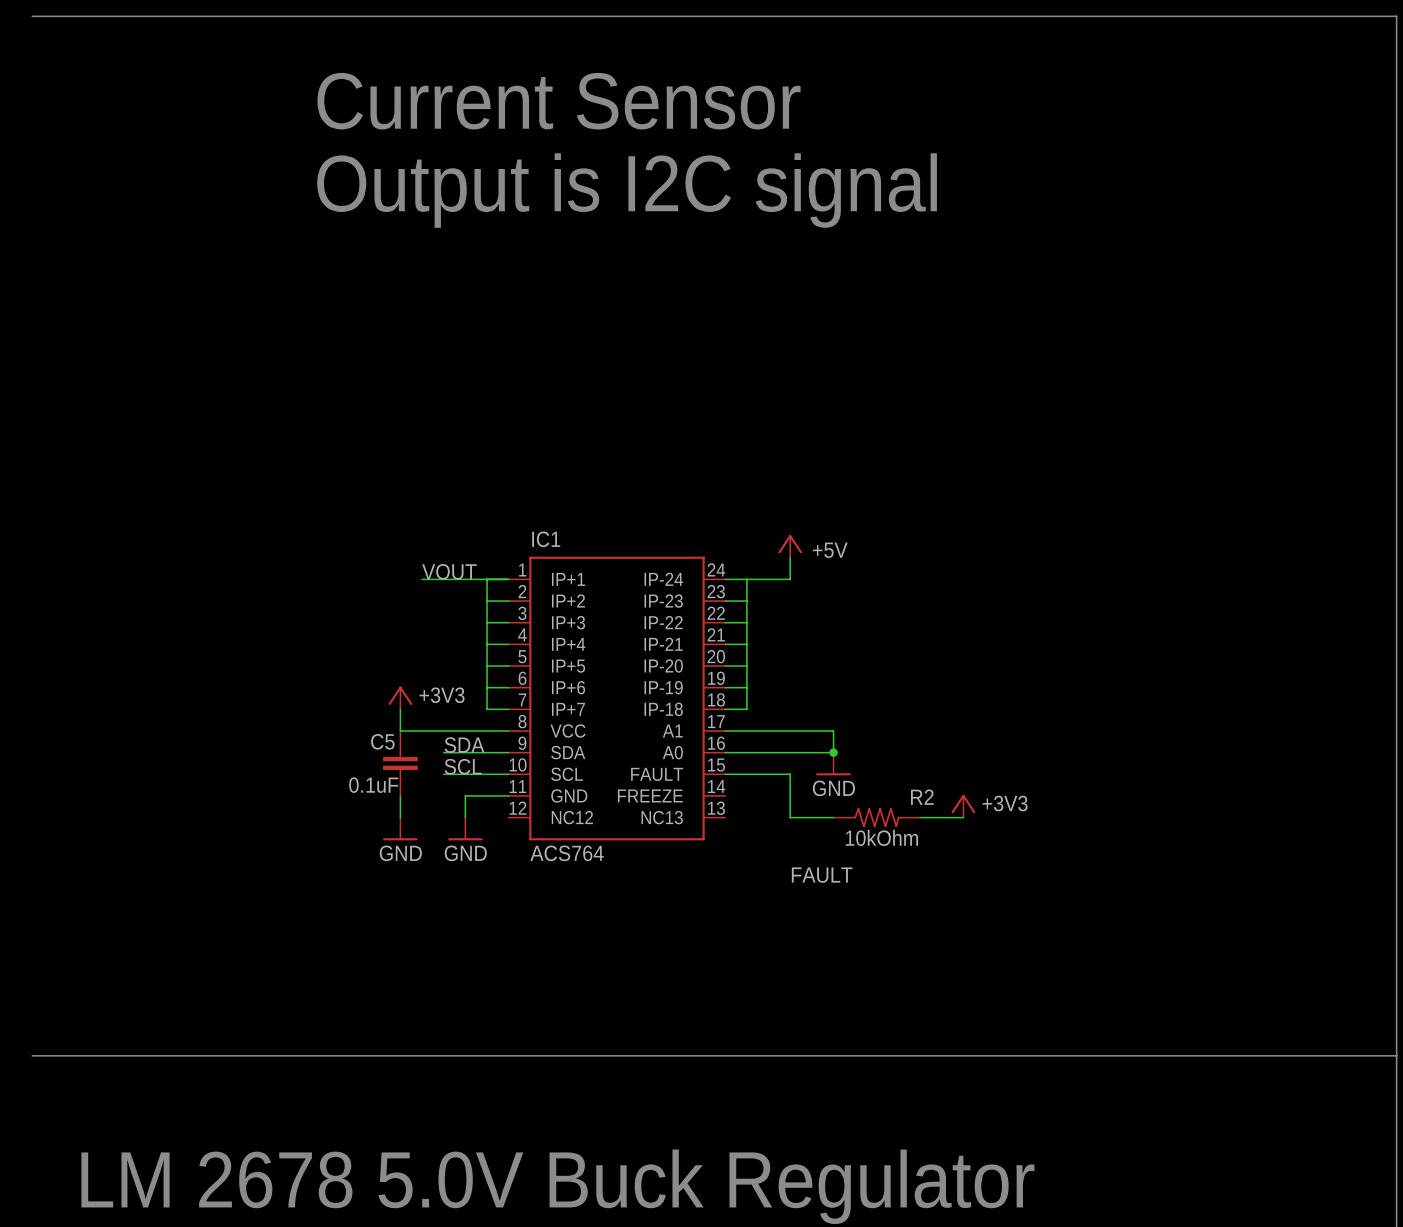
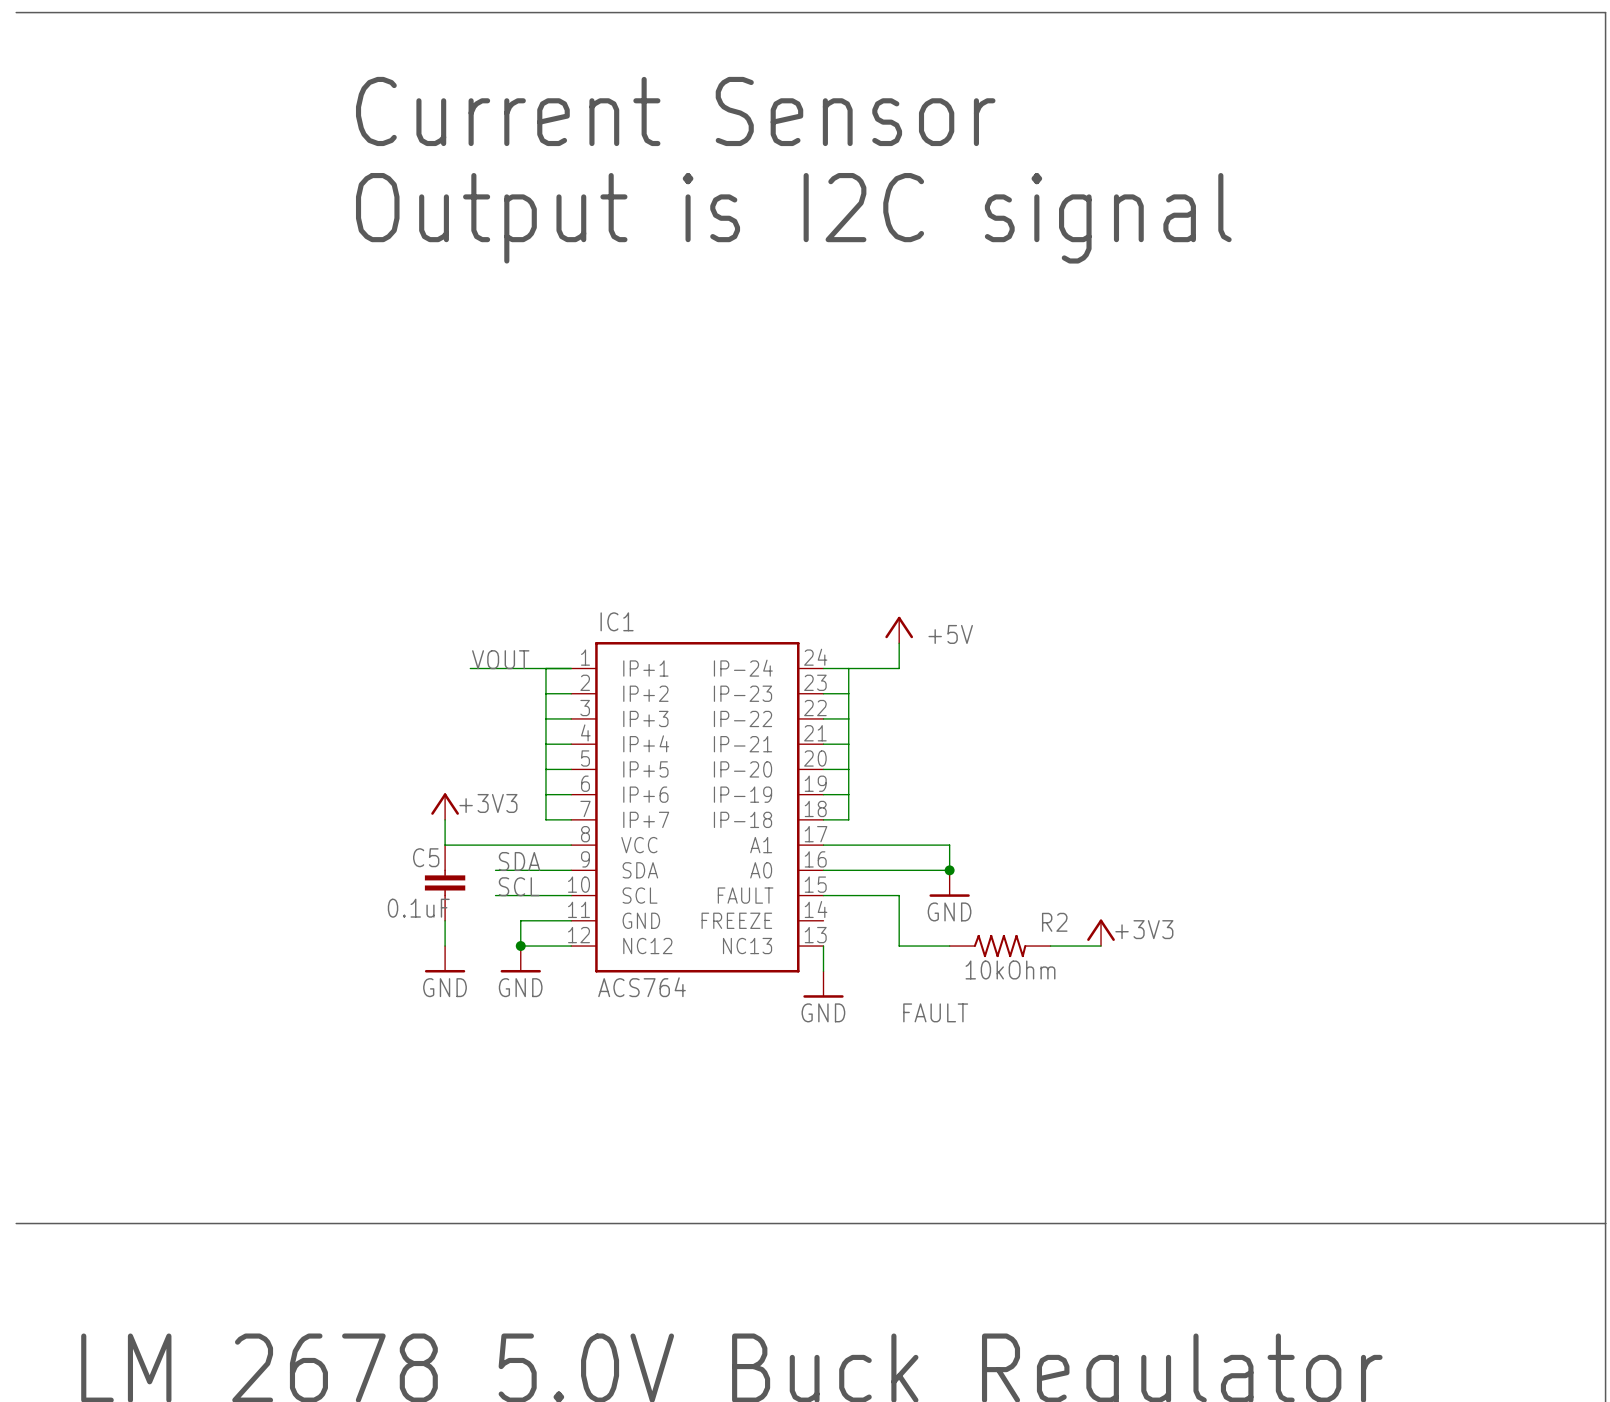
wire: none -> (520, 946) (571, 946)
junction: none -> (520, 946)
wire: none -> (823, 946) (823, 971)
power symbol: none -> GND (823, 984)

